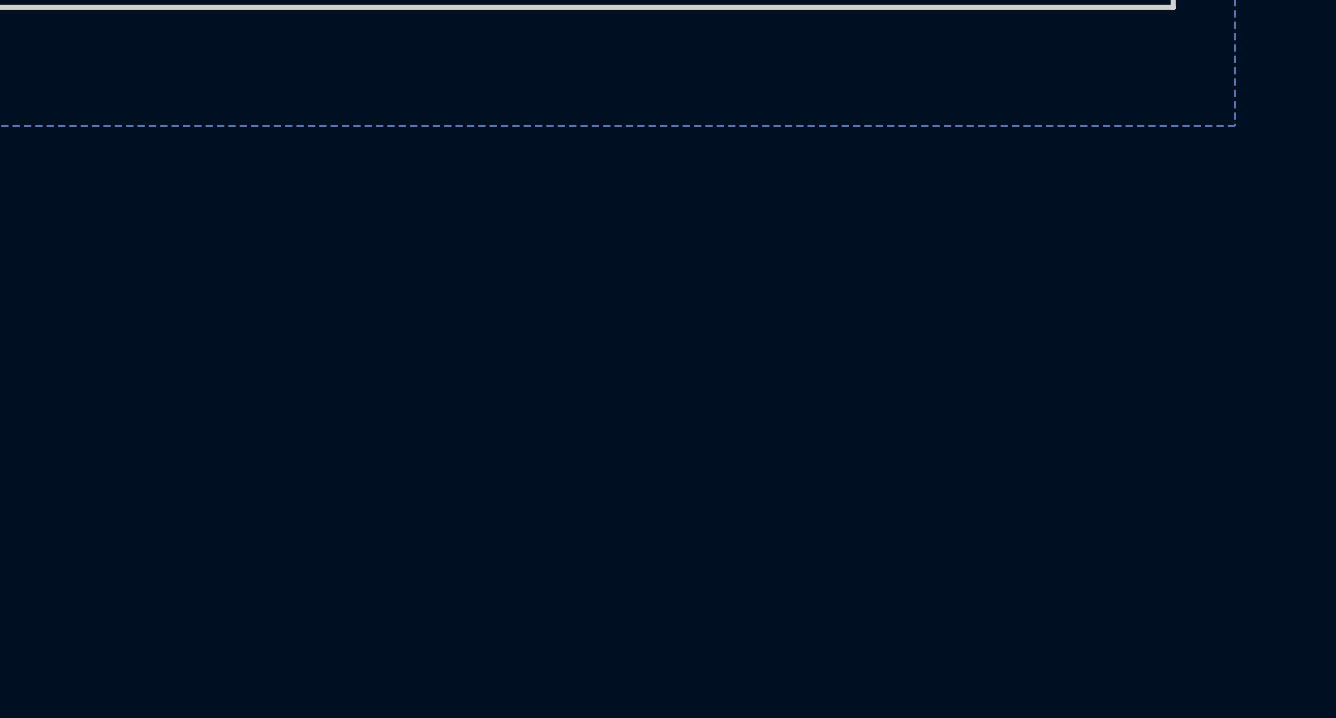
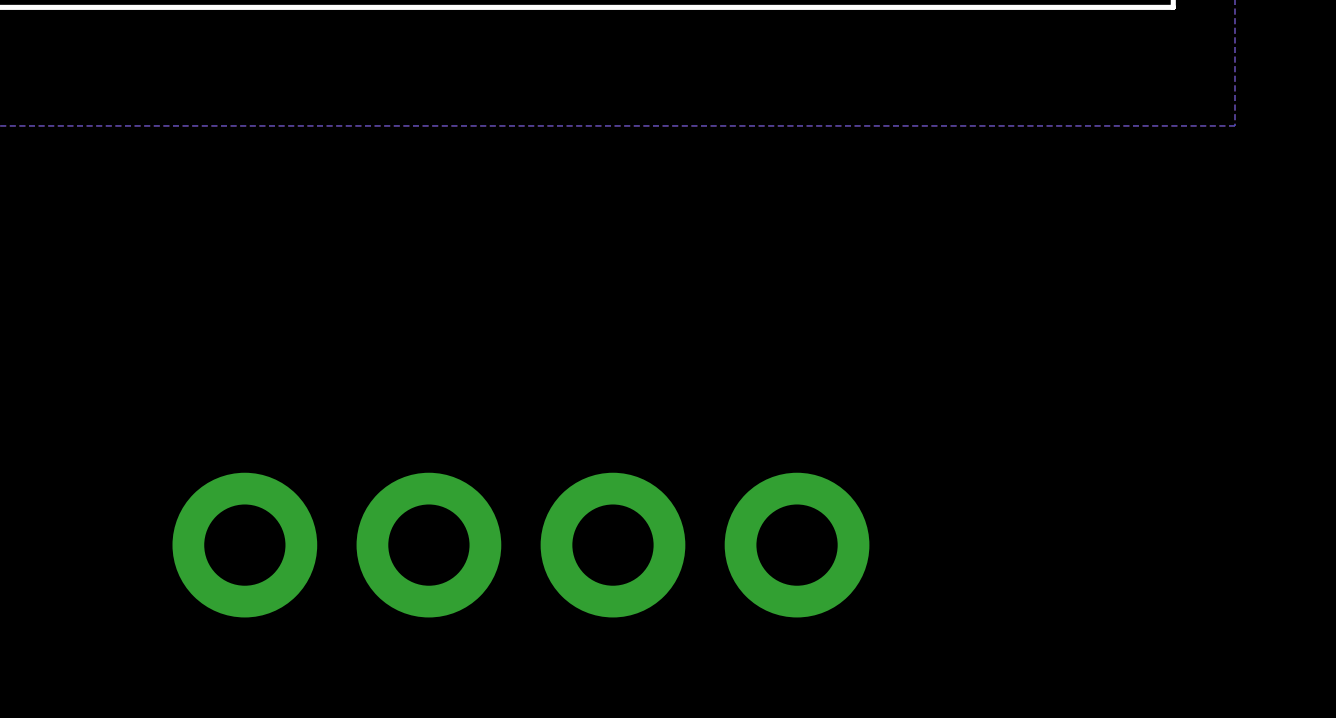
part: none -> (244, 545)
part: none -> (428, 545)
part: none -> (612, 545)
part: none -> (797, 545)

